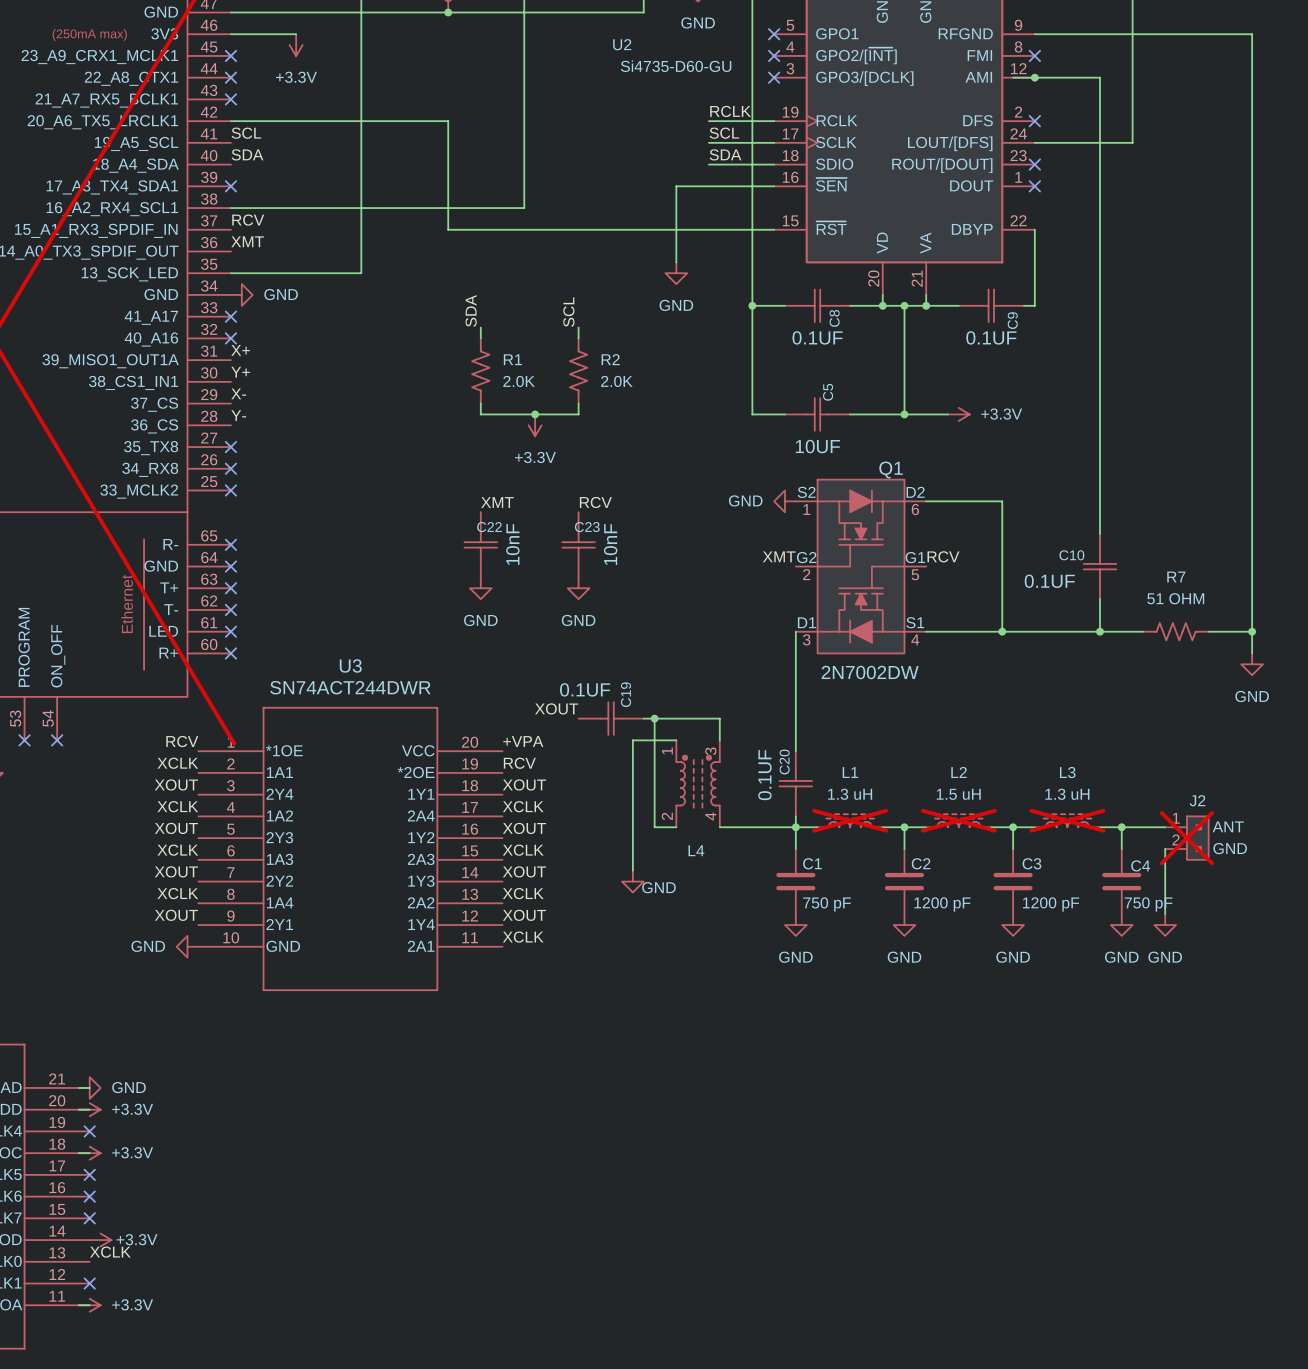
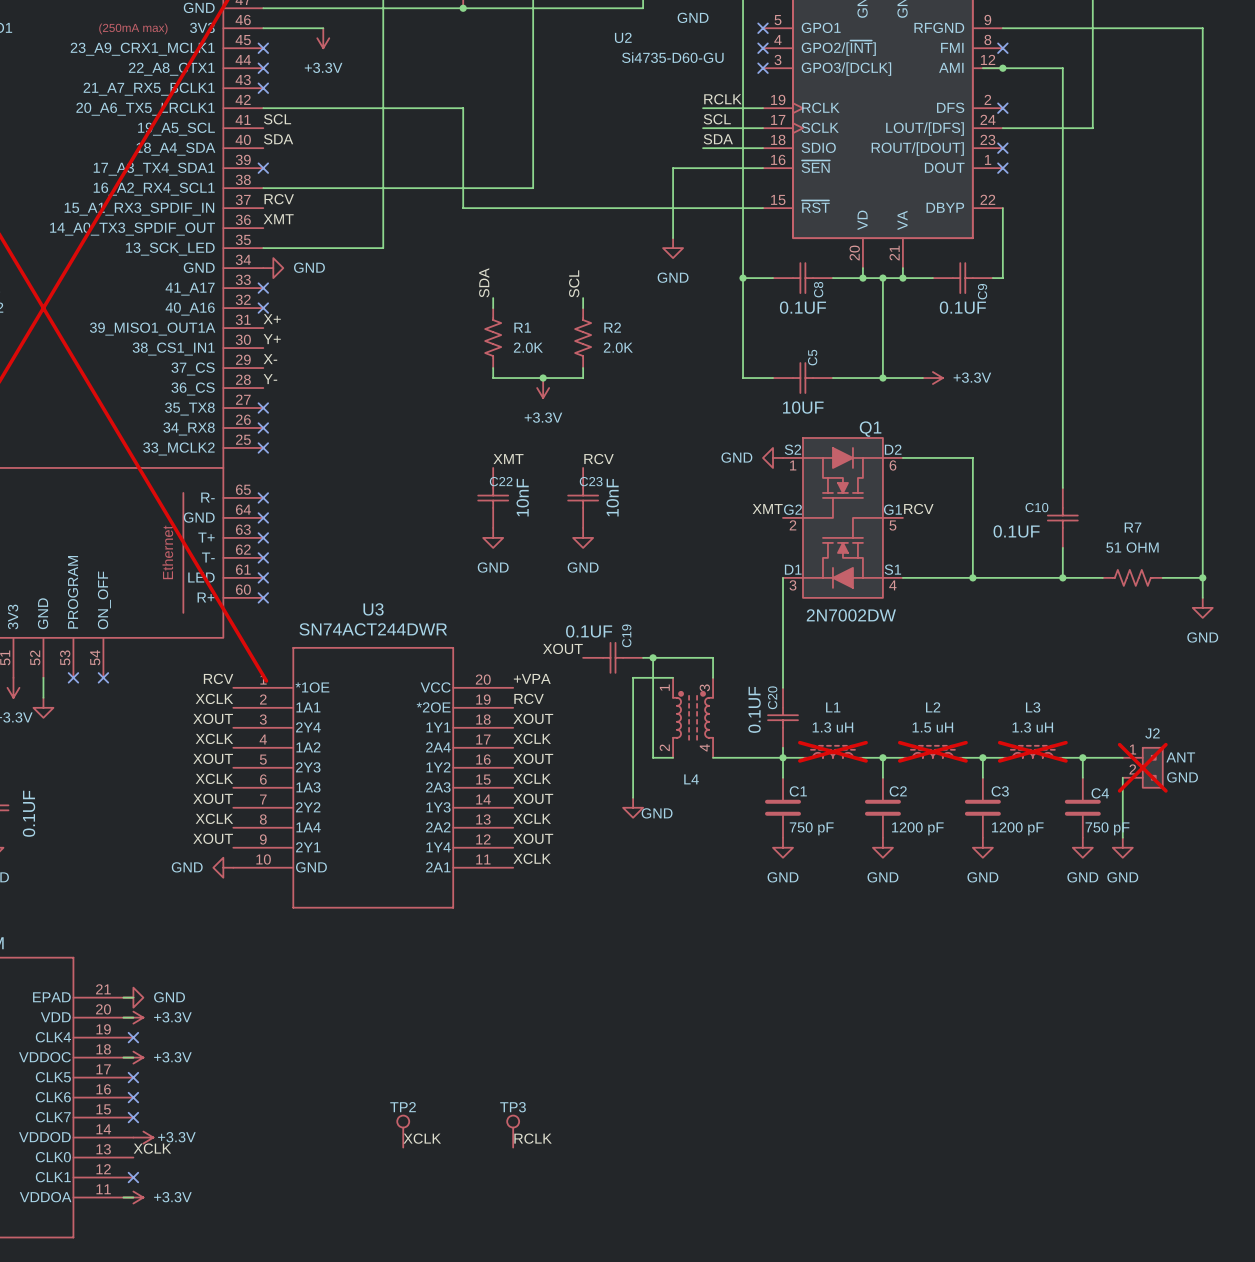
TP2: none -> (403, 1131)
TP3: none -> (513, 1131)
label: none -> XCLK (422, 1138)
label: none -> RCLK (533, 1138)

